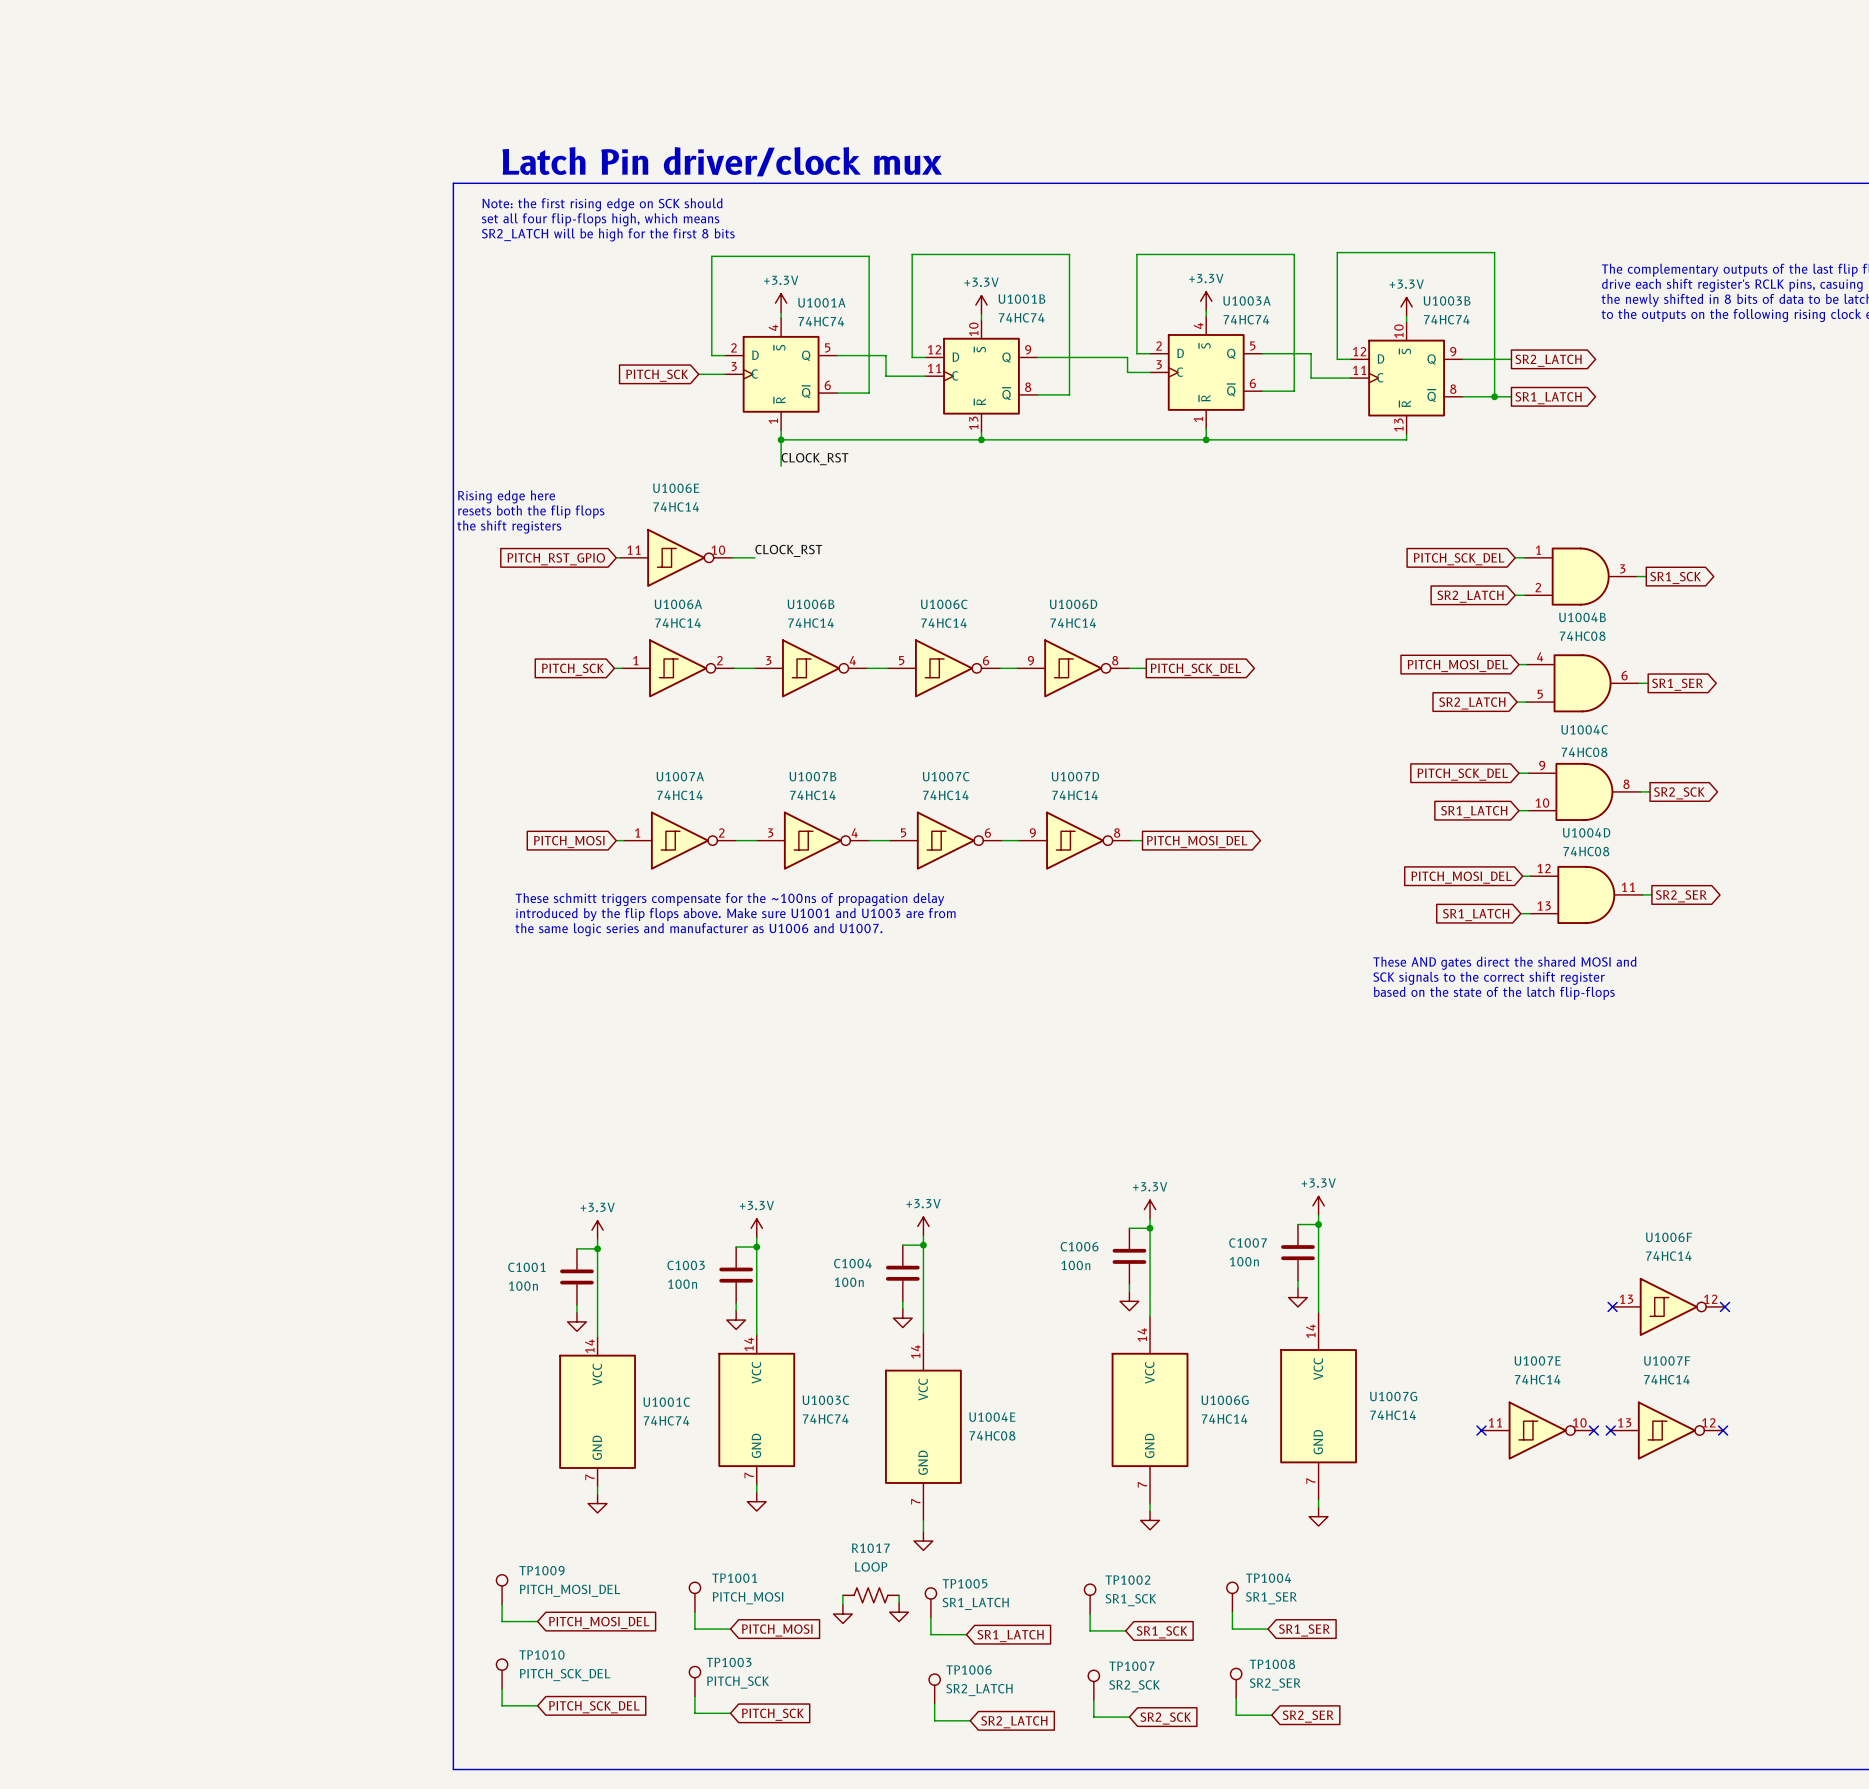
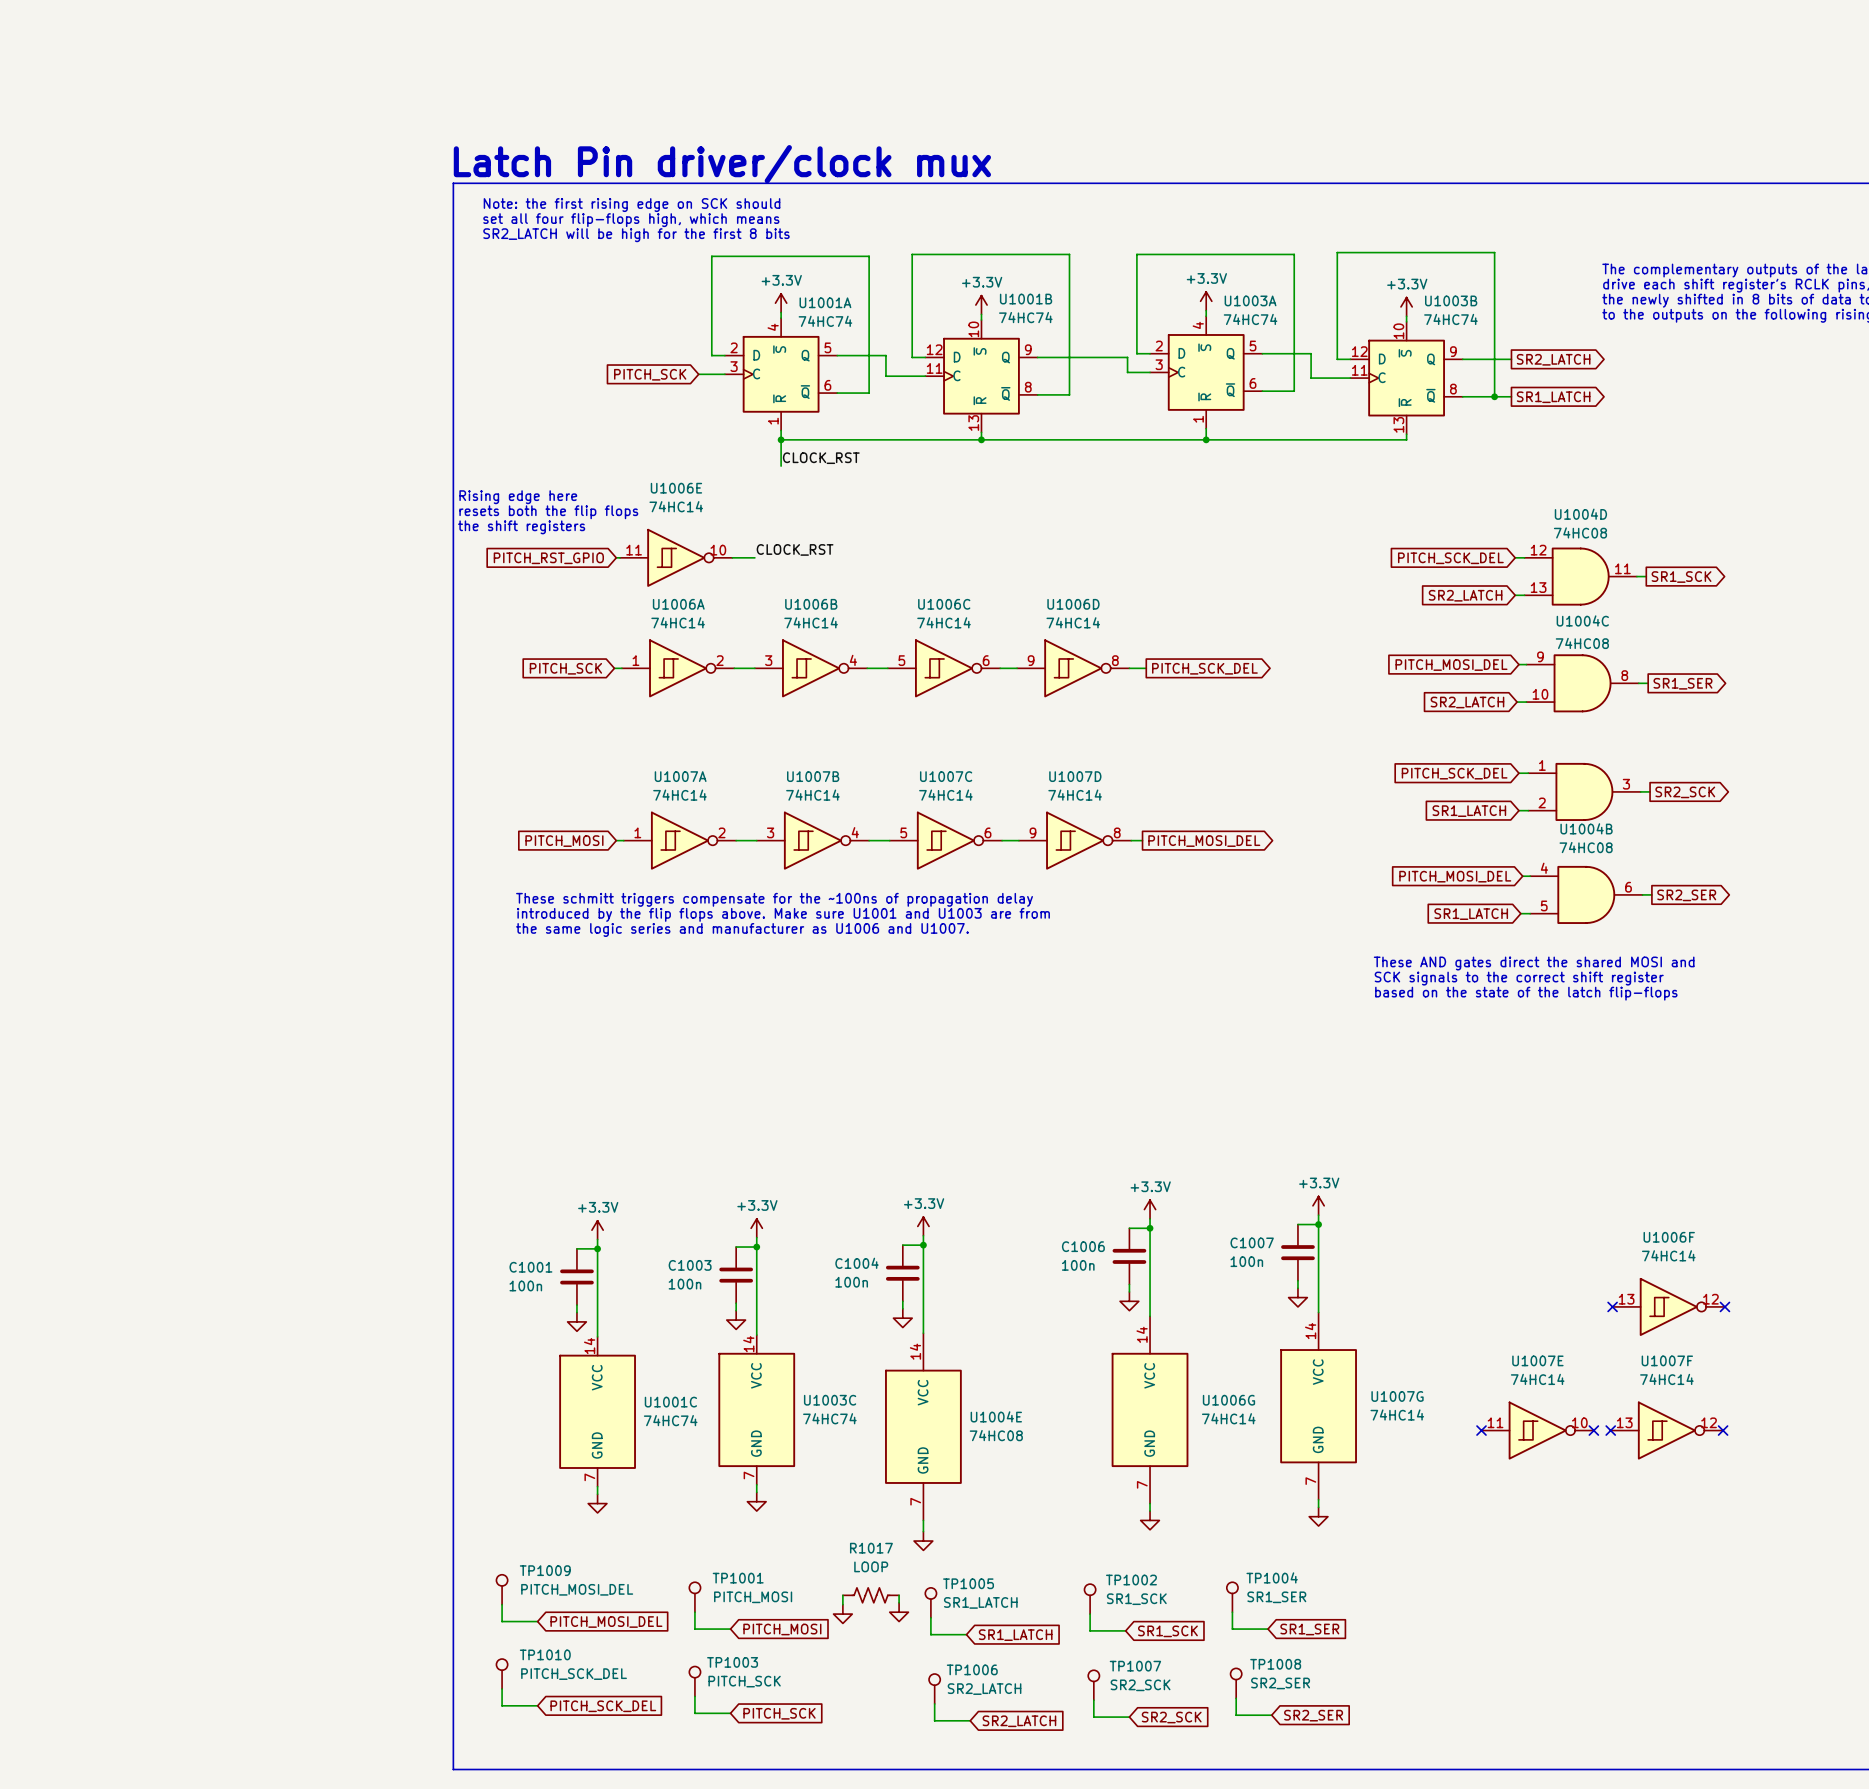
part: (1580, 576) -> none
U1004B position: (1582, 683) -> (1586, 894)
U1004C position: (1584, 791) -> (1582, 683)
part: none -> (1584, 791)
U1004D position: (1586, 894) -> (1580, 576)

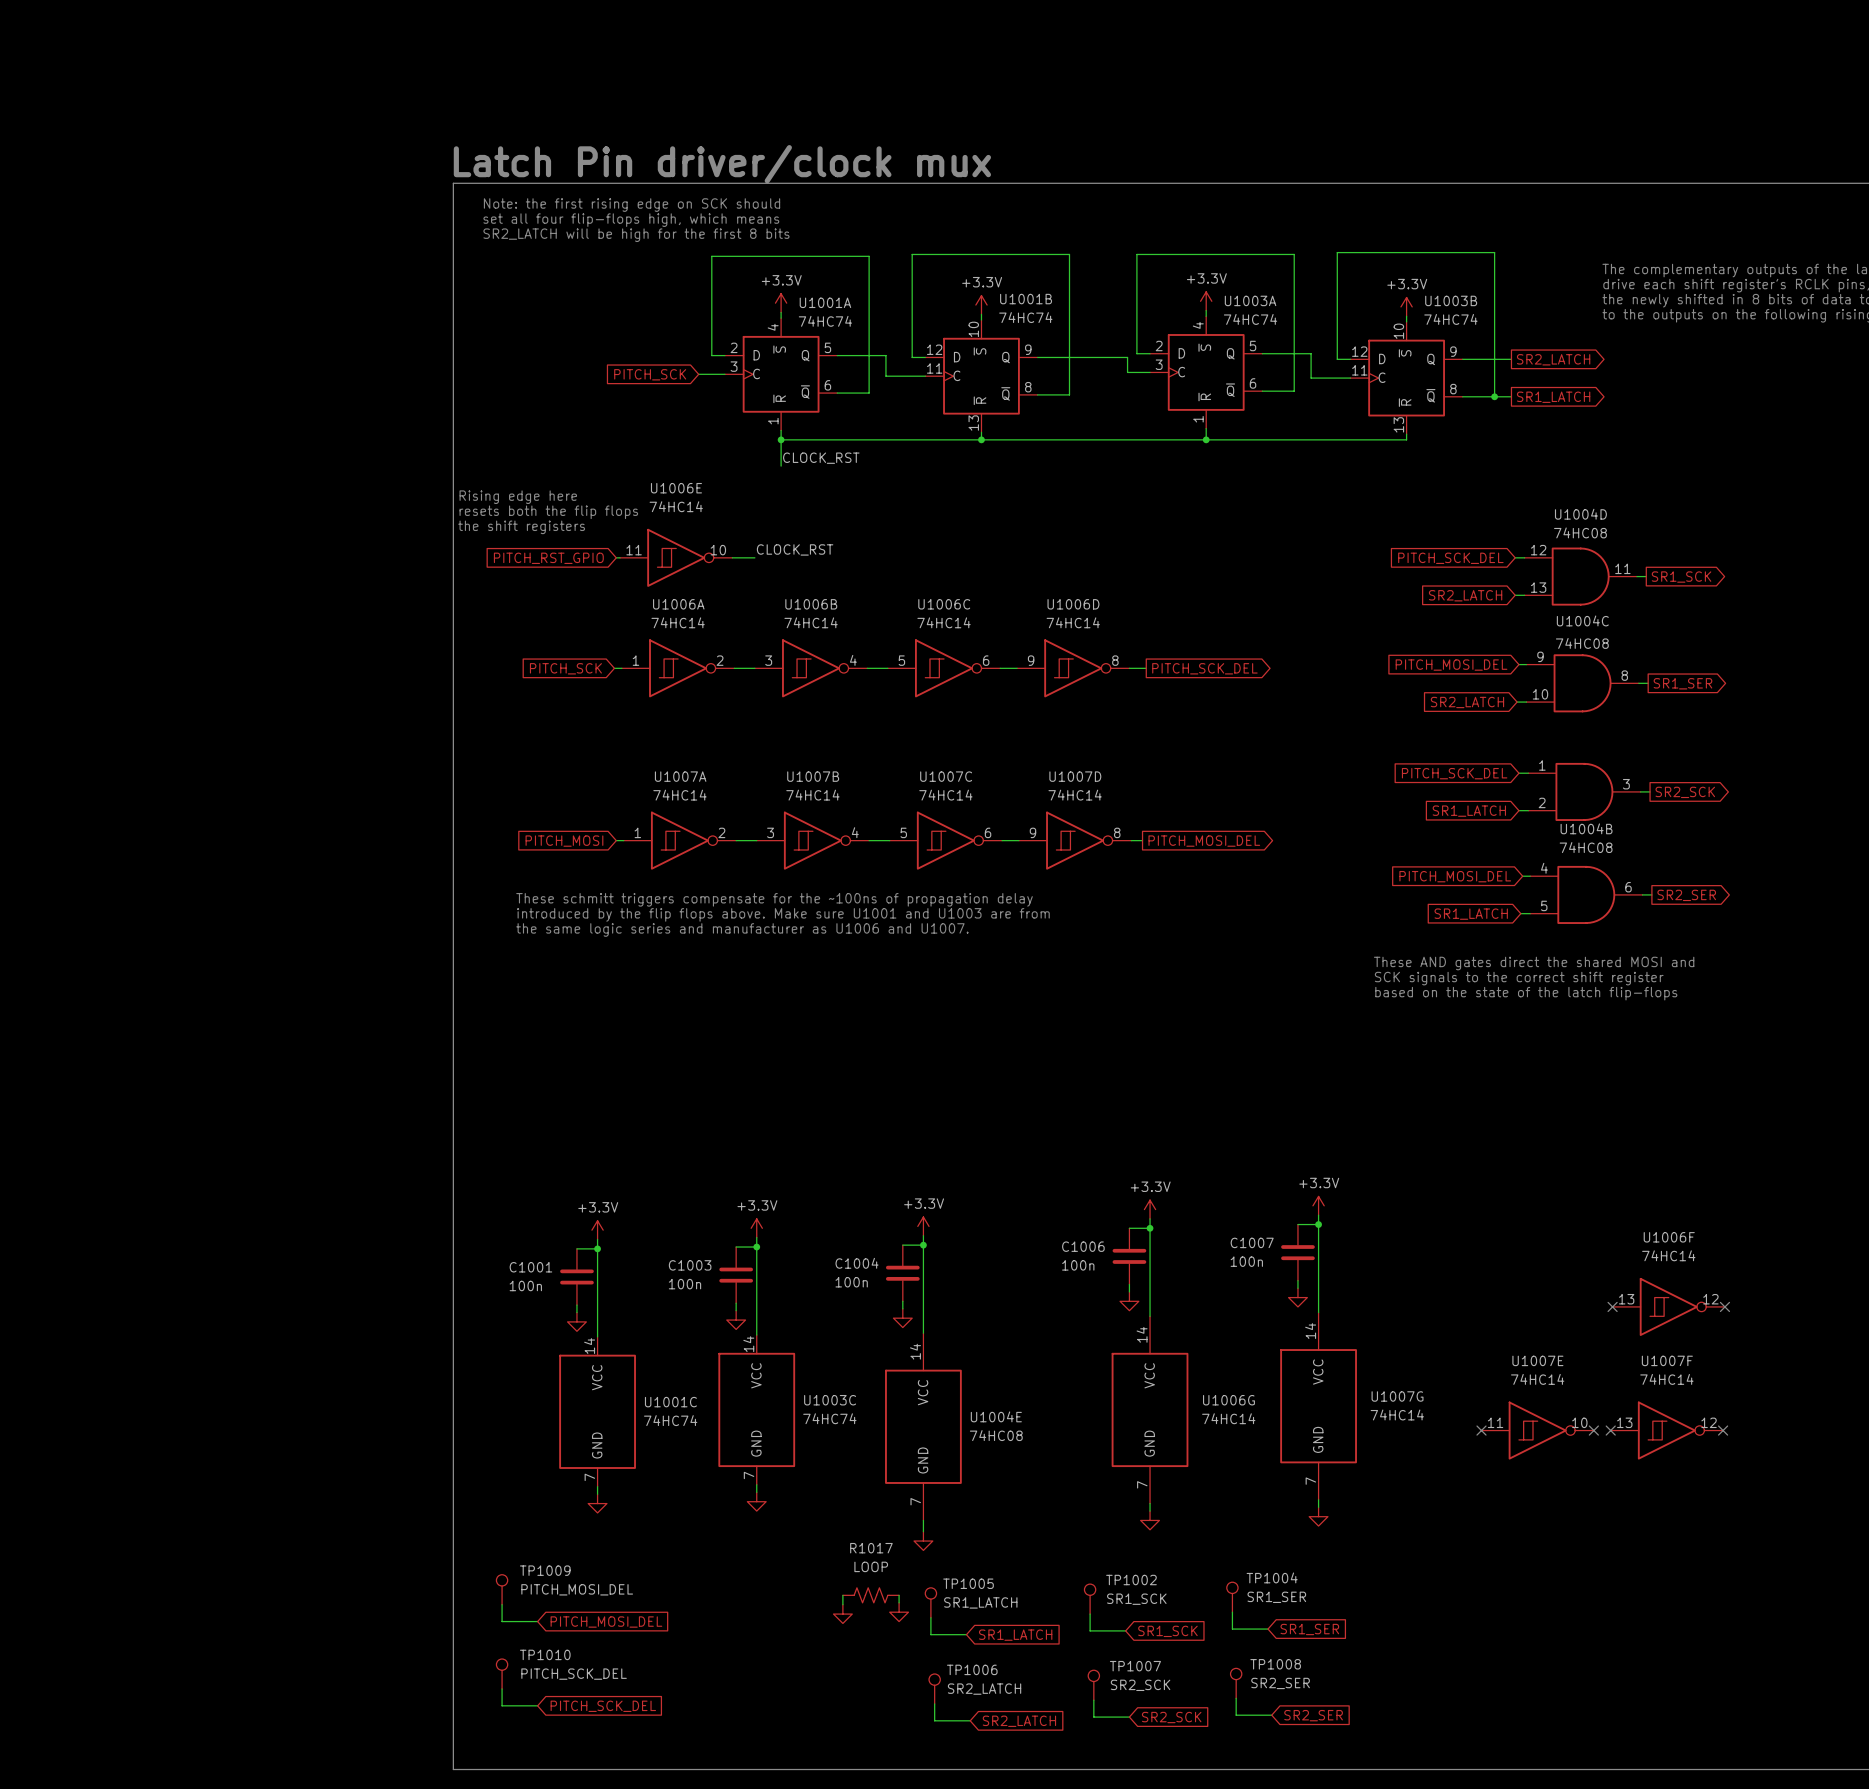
TP1001: PITCH_MOSI (694, 1597) -> none
wire: (694, 1612) (694, 1629) (730, 1629) -> none
global label: PITCH_MOSI (782, 1629) -> none
TP1003: PITCH_SCK (694, 1681) -> none
wire: (694, 1696) (694, 1713) (730, 1713) -> none
global label: PITCH_SCK (779, 1713) -> none

